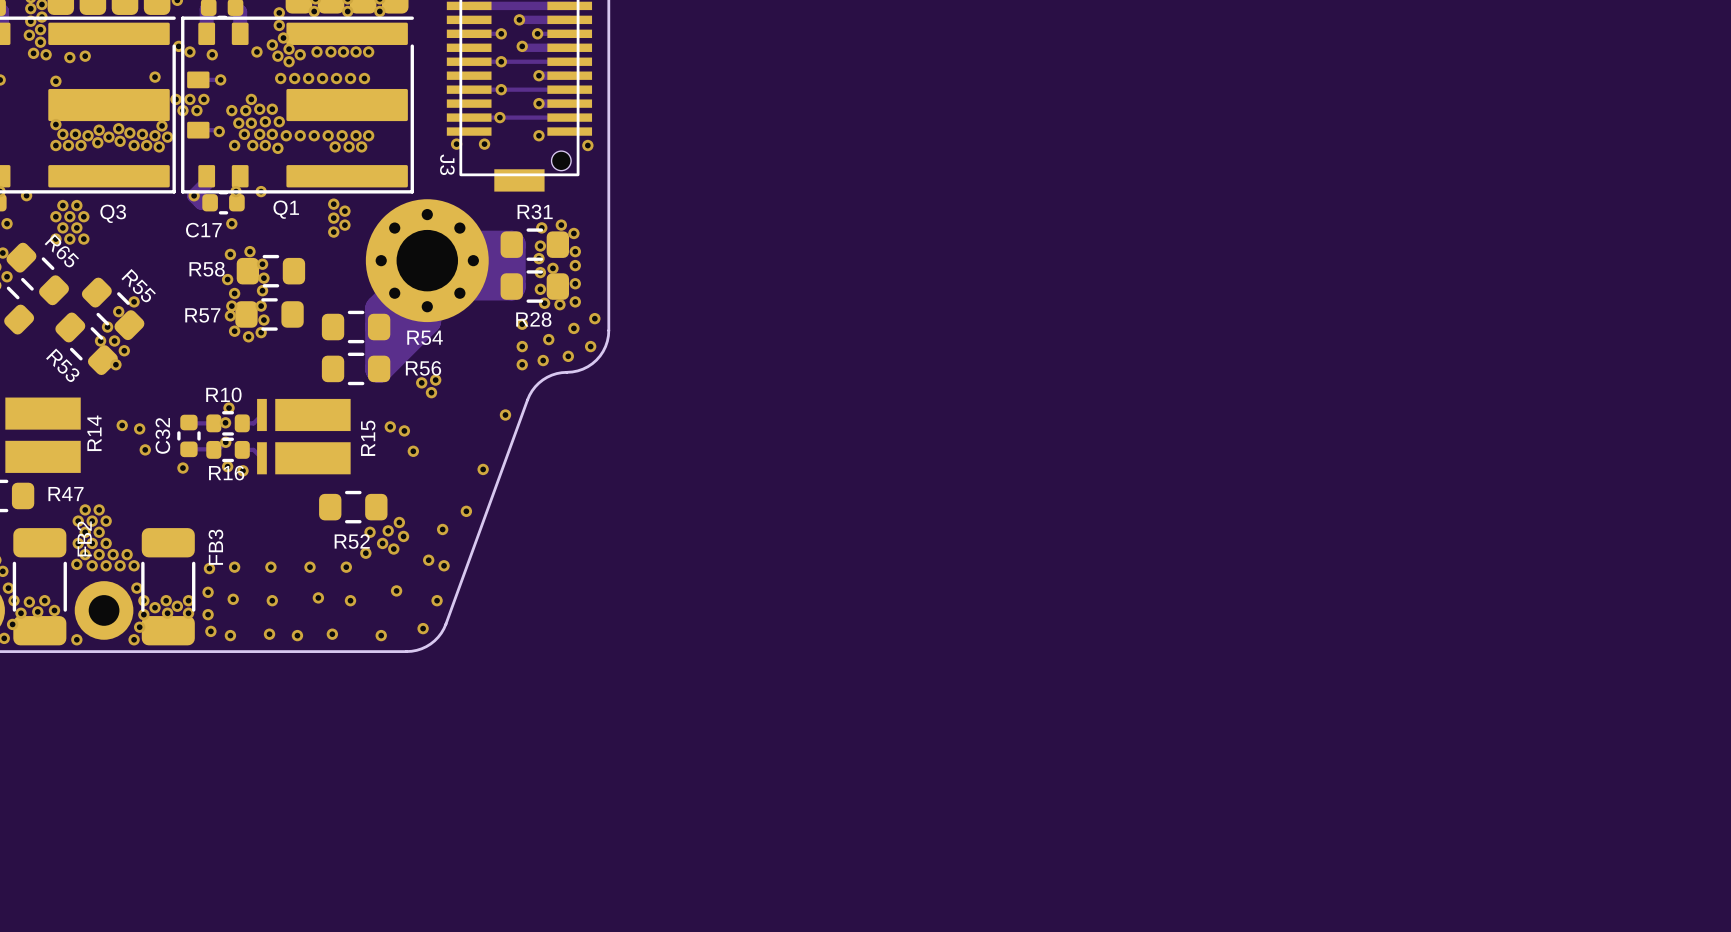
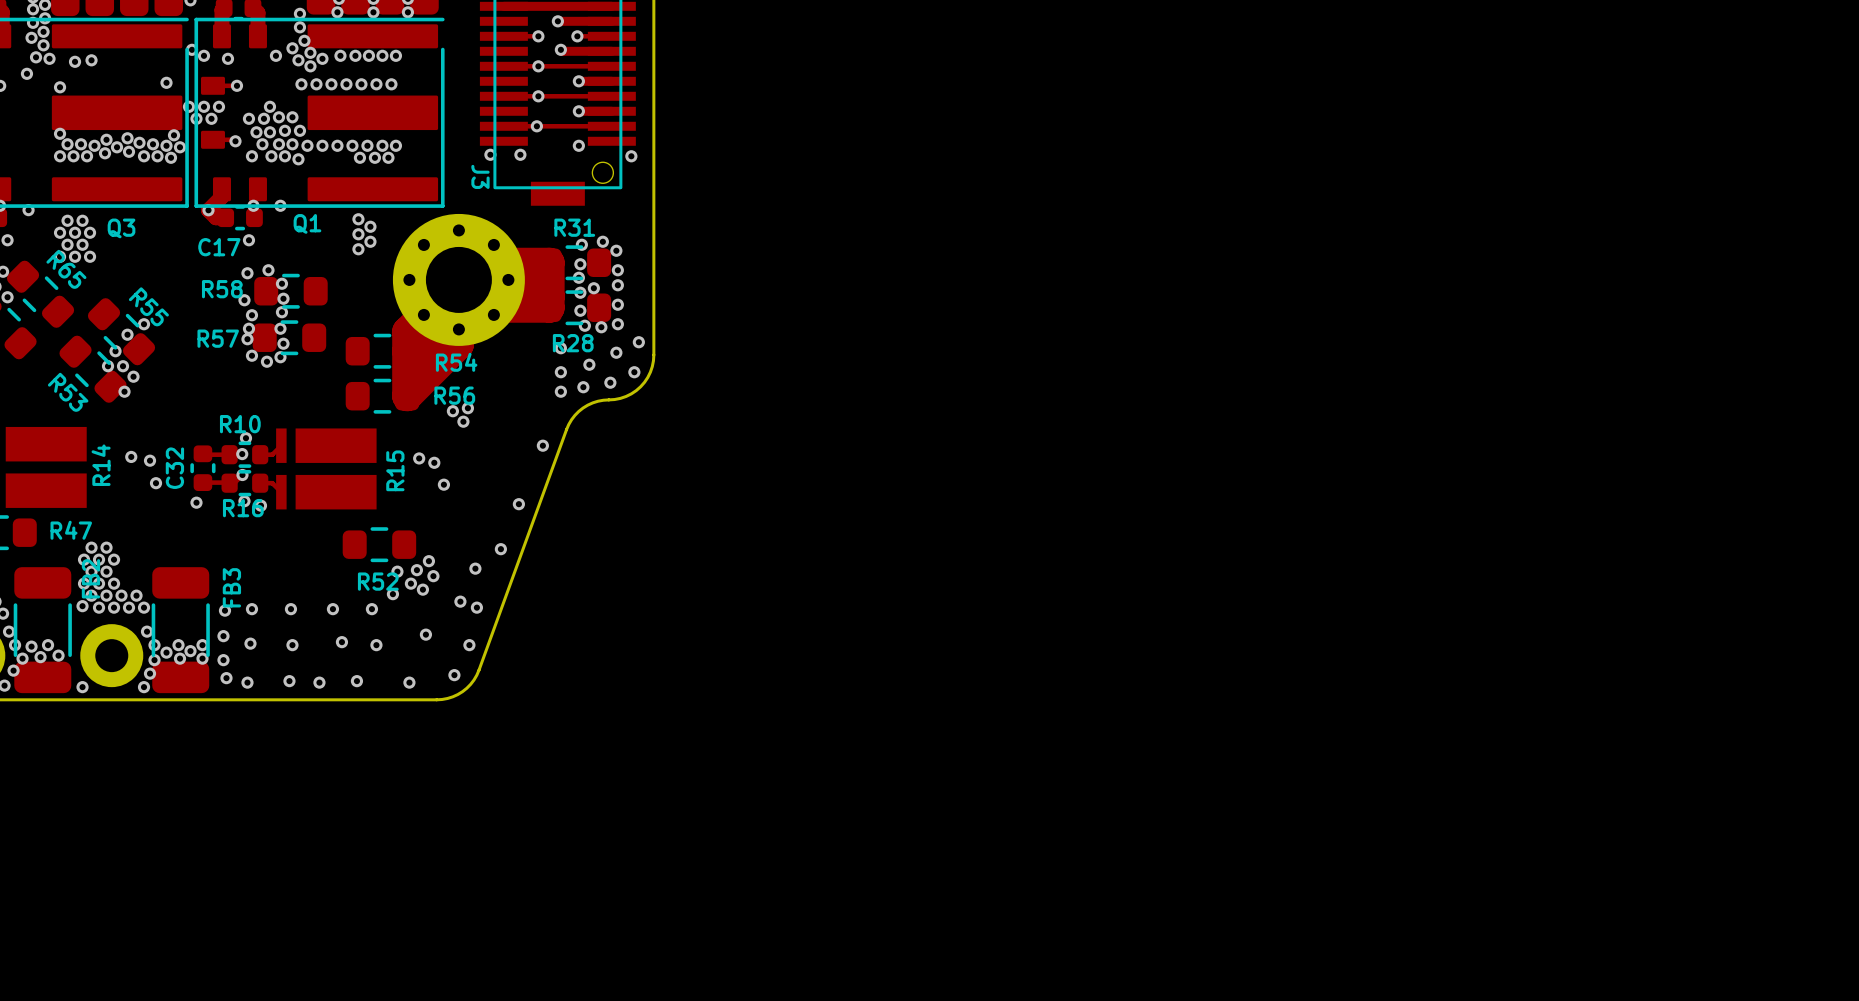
via: none -> (26, 73)

